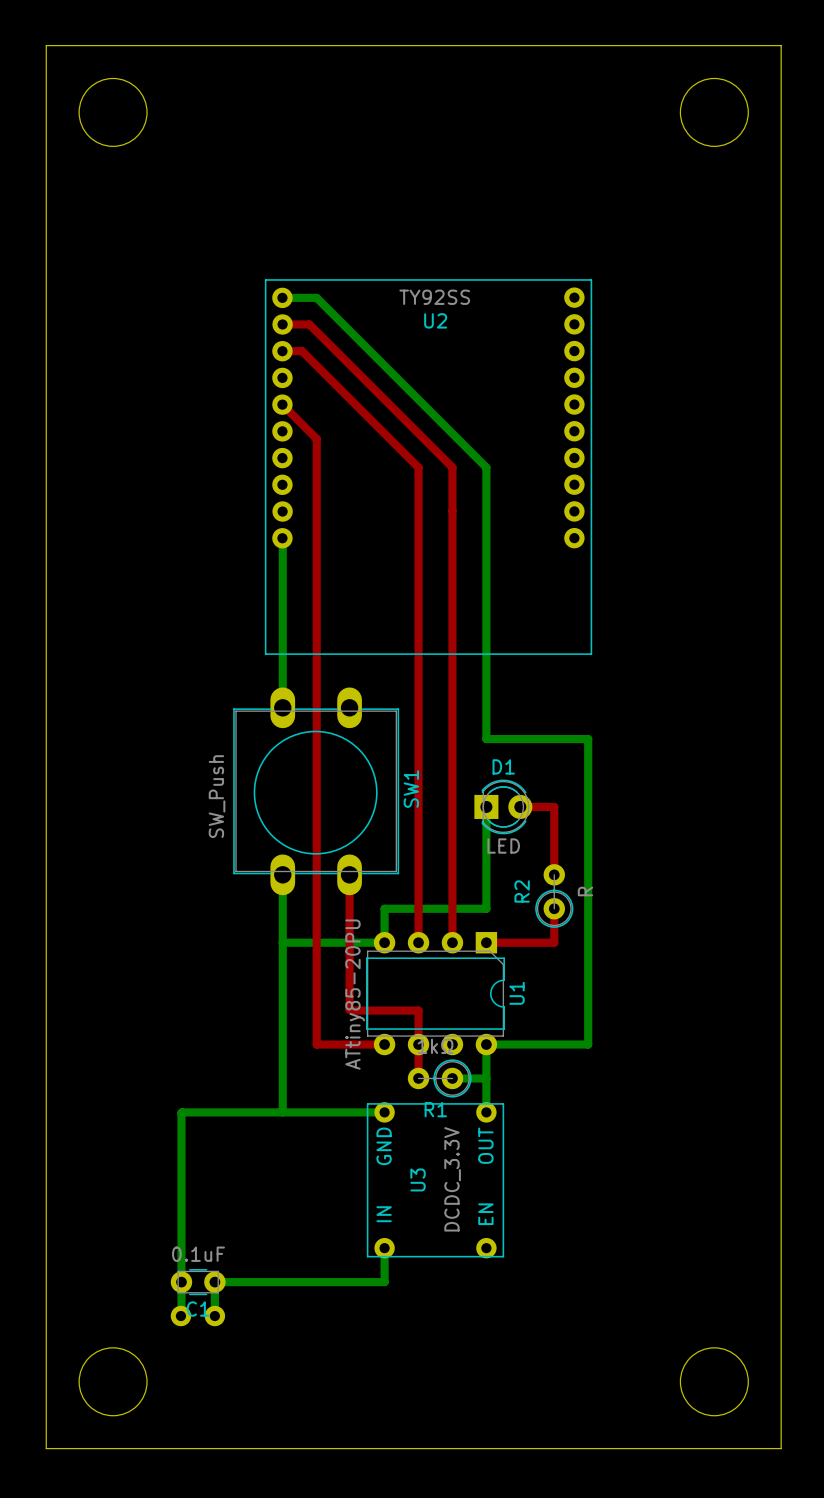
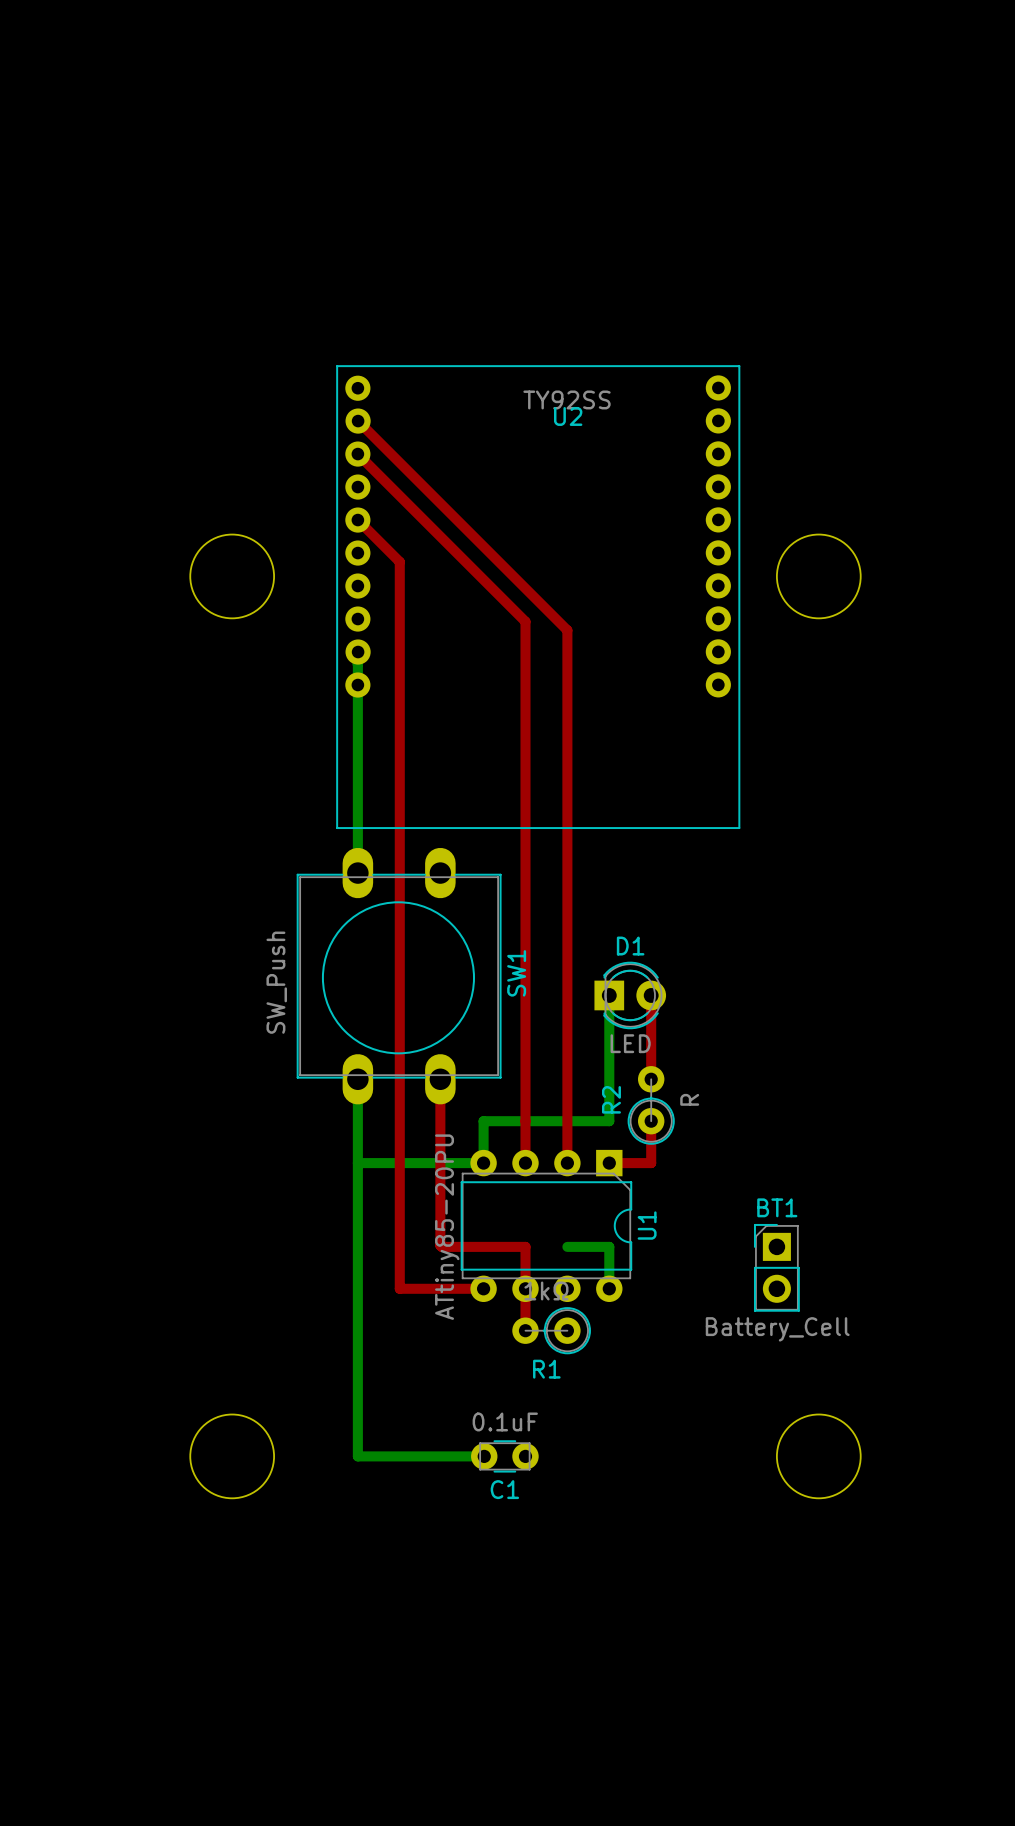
board edge: (46, 45) (46, 1448) (781, 1448) (781, 45) (46, 45) -> none
round board edge: [78, 78, 148, 147] -> none
round board edge: [680, 78, 749, 147] -> none
bottom track: (282, 297) (316, 297) (486, 467) (486, 739) (588, 739) (588, 1044) (486, 1044) (486, 1112) -> none
U2 value position: TY92SS (434, 297) -> TY92SS (567, 399)
U2 name position: U2 (435, 320) -> U2 (568, 416)
top track: (282, 324) (309, 324) (452, 467) (452, 511) -> (358, 421) (567, 630)
top track: (282, 351) (302, 351) (418, 467) (418, 504) -> (357, 454) (525, 621)
top track: (282, 404) (316, 438) (316, 455) -> (357, 520) (399, 561)
round board edge: none -> [189, 534, 275, 619]
round board edge: none -> [776, 534, 862, 619]
U2 position: (428, 467) -> (538, 597)
top track: (520, 806) (554, 806) (554, 874) -> (651, 995) (651, 1079)
R2 position: (554, 896) -> (651, 1105)
top track: (554, 908) (554, 942) (520, 942) -> (651, 1121) (651, 1163)
bottom track: none -> (567, 1246) (609, 1246) (609, 1288)
BT1: none -> Battery_Cell (776, 1267)
bottom track: (452, 1078) (486, 1078) -> none
bottom track: none -> (357, 1372) (357, 1456) (483, 1456)
bottom track: (384, 1112) (181, 1112) (180, 1316) -> none
U3: DCDC_3.3V (435, 1180) -> none
bottom track: (384, 1248) (384, 1282) (214, 1282) (214, 1316) -> none
C1 position: (198, 1282) -> (504, 1456)
part: (197, 1316) -> none
round board edge position: (113, 1381) -> (232, 1456)
round board edge position: (714, 1381) -> (818, 1456)

